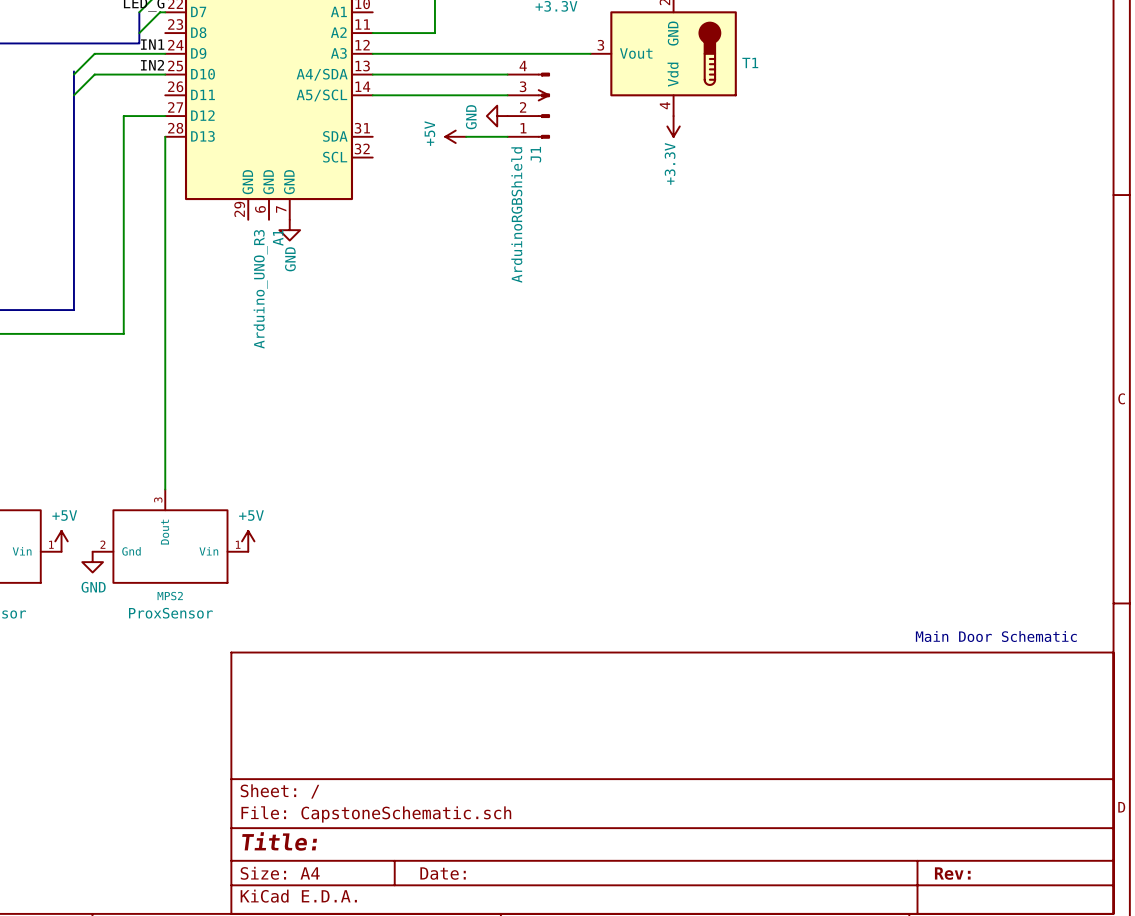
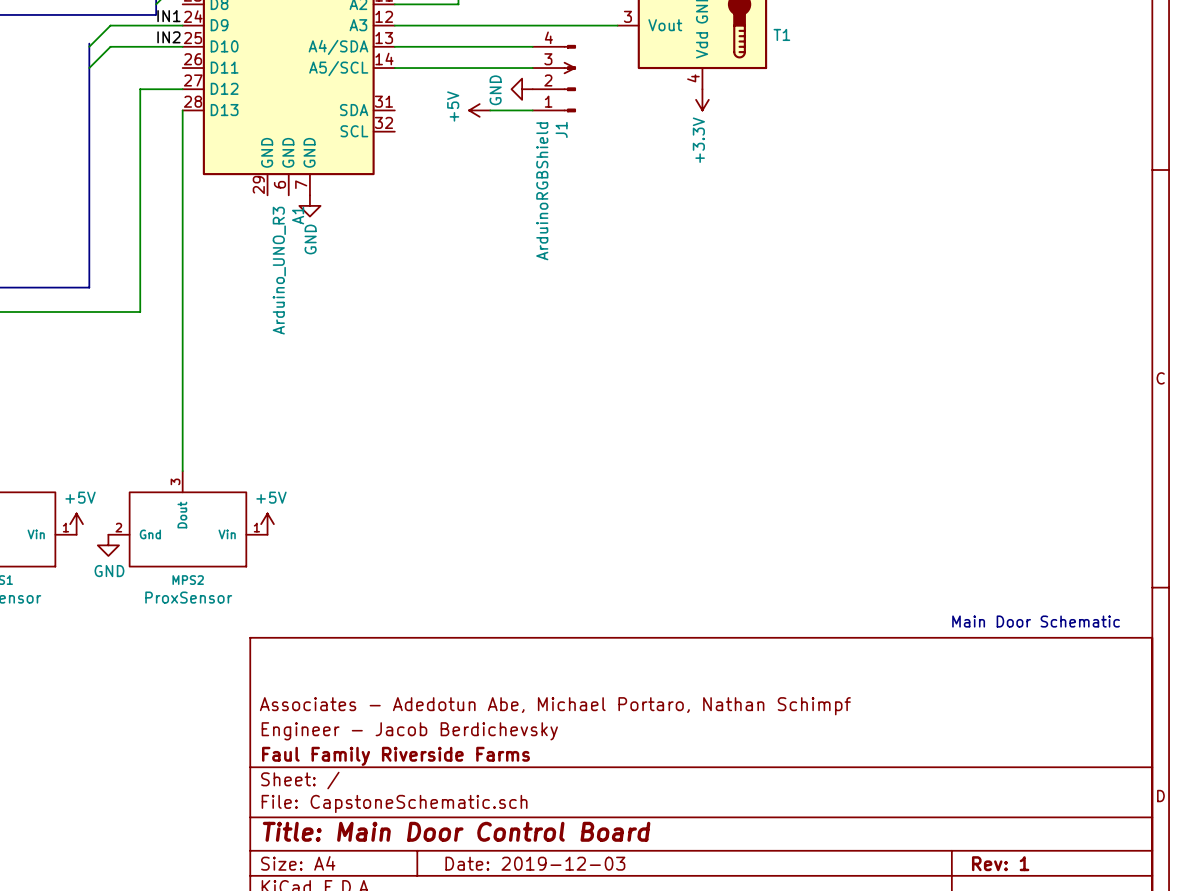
title block: none -> Associates - Adedotun Abe, Michael Portaro, Nathan Schimpf (555, 706)
title block: none -> Engineer - Jacob Berdichevsky (409, 731)
title block: none -> Faul Family Riverside Farms (395, 756)
title block: Title: (279, 841) -> Title: Main Door Control Board (456, 831)
title block: Date: (443, 873) -> Date: 2019-12-03 (535, 863)
title block: Rev: (952, 873) -> Rev: 1 (1000, 863)

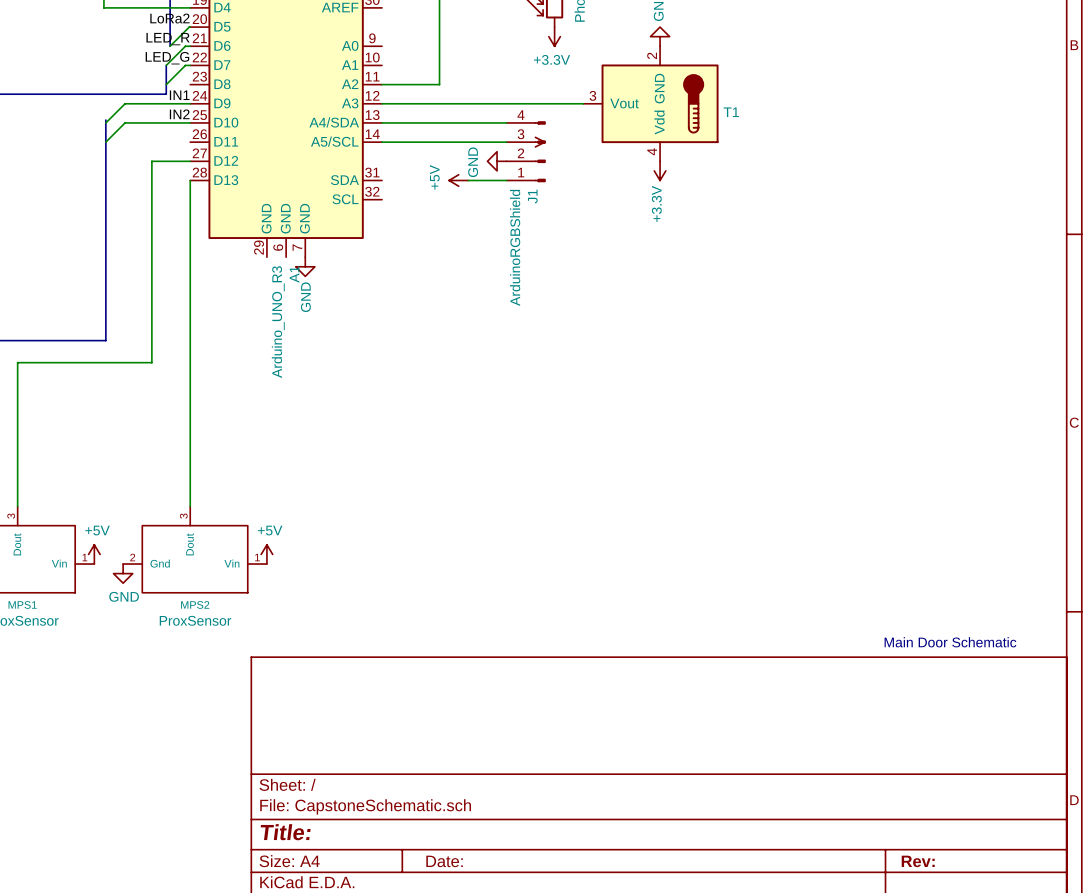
title block: Associates - Adedotun Abe, Michael Portaro, Nathan Schimpf (555, 706) -> none
title block: Engineer - Jacob Berdichevsky (409, 731) -> none
title block: Faul Family Riverside Farms (395, 756) -> none
title block: Title: Main Door Control Board (456, 831) -> Title: (285, 832)
title block: Date: 2019-12-03 (535, 863) -> Date: (444, 861)
title block: Rev: 1 (1000, 863) -> Rev: (918, 861)

